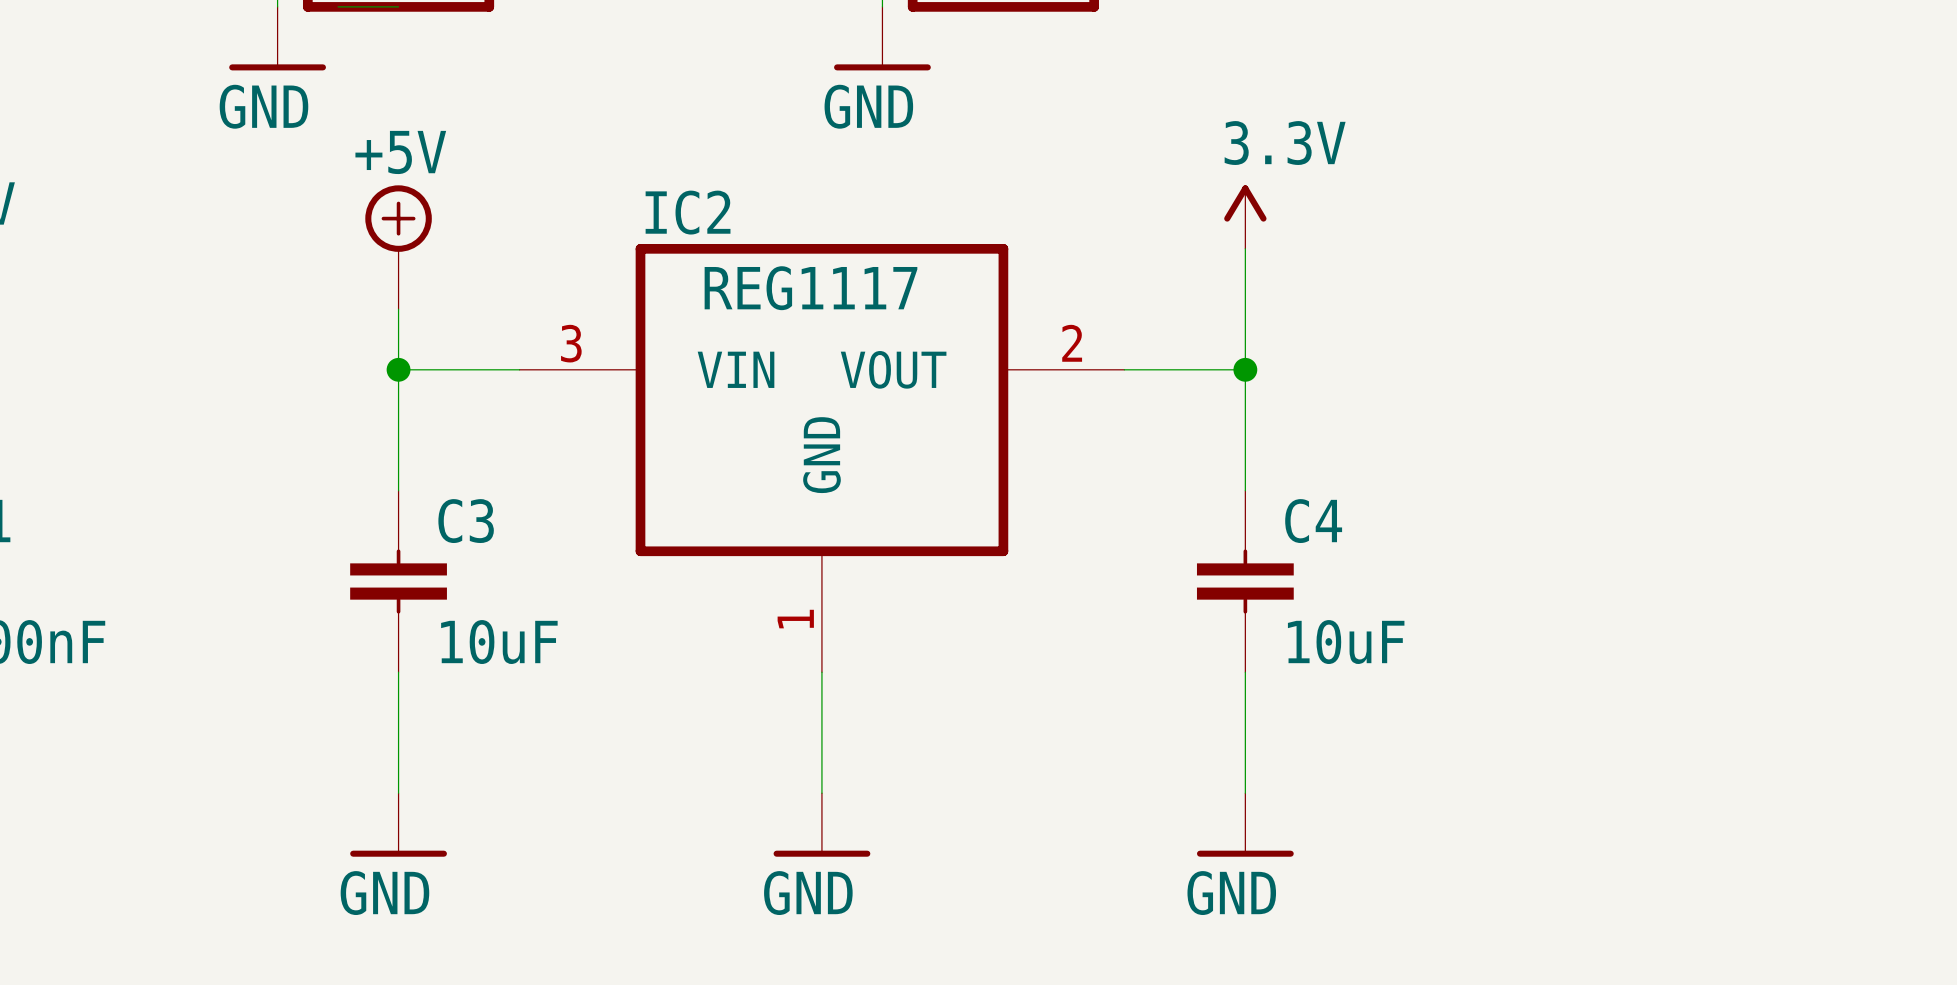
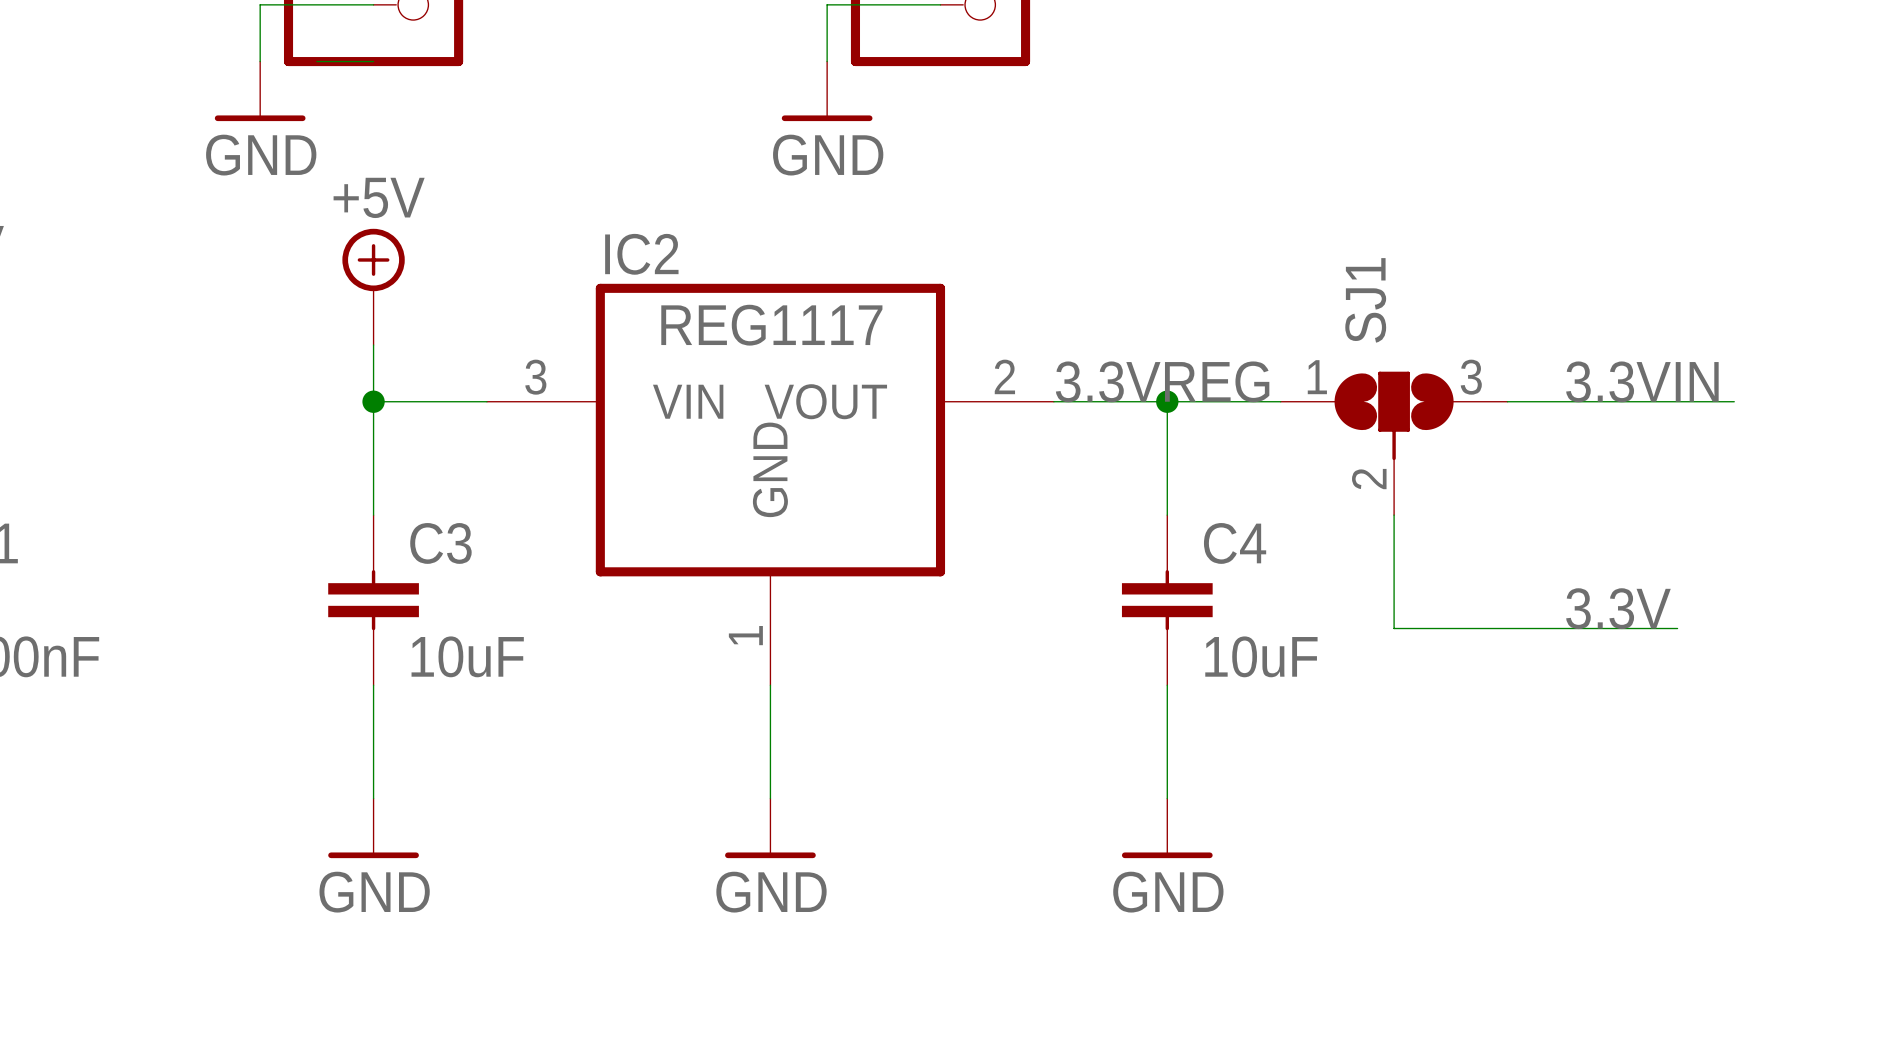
power symbol: 3.3V (1245, 217) -> none
wire: (1245, 248) (1245, 369) -> (1280, 401) (1167, 401)
label: none -> 3.3VREG (1162, 381)
label: none -> 3.3VIN (1642, 381)
wire: none -> (1507, 401) (1734, 401)
SJ1: none -> (1394, 443)
wire: none -> (1394, 515) (1394, 628) (1677, 628)
label: none -> 3.3V (1618, 608)

